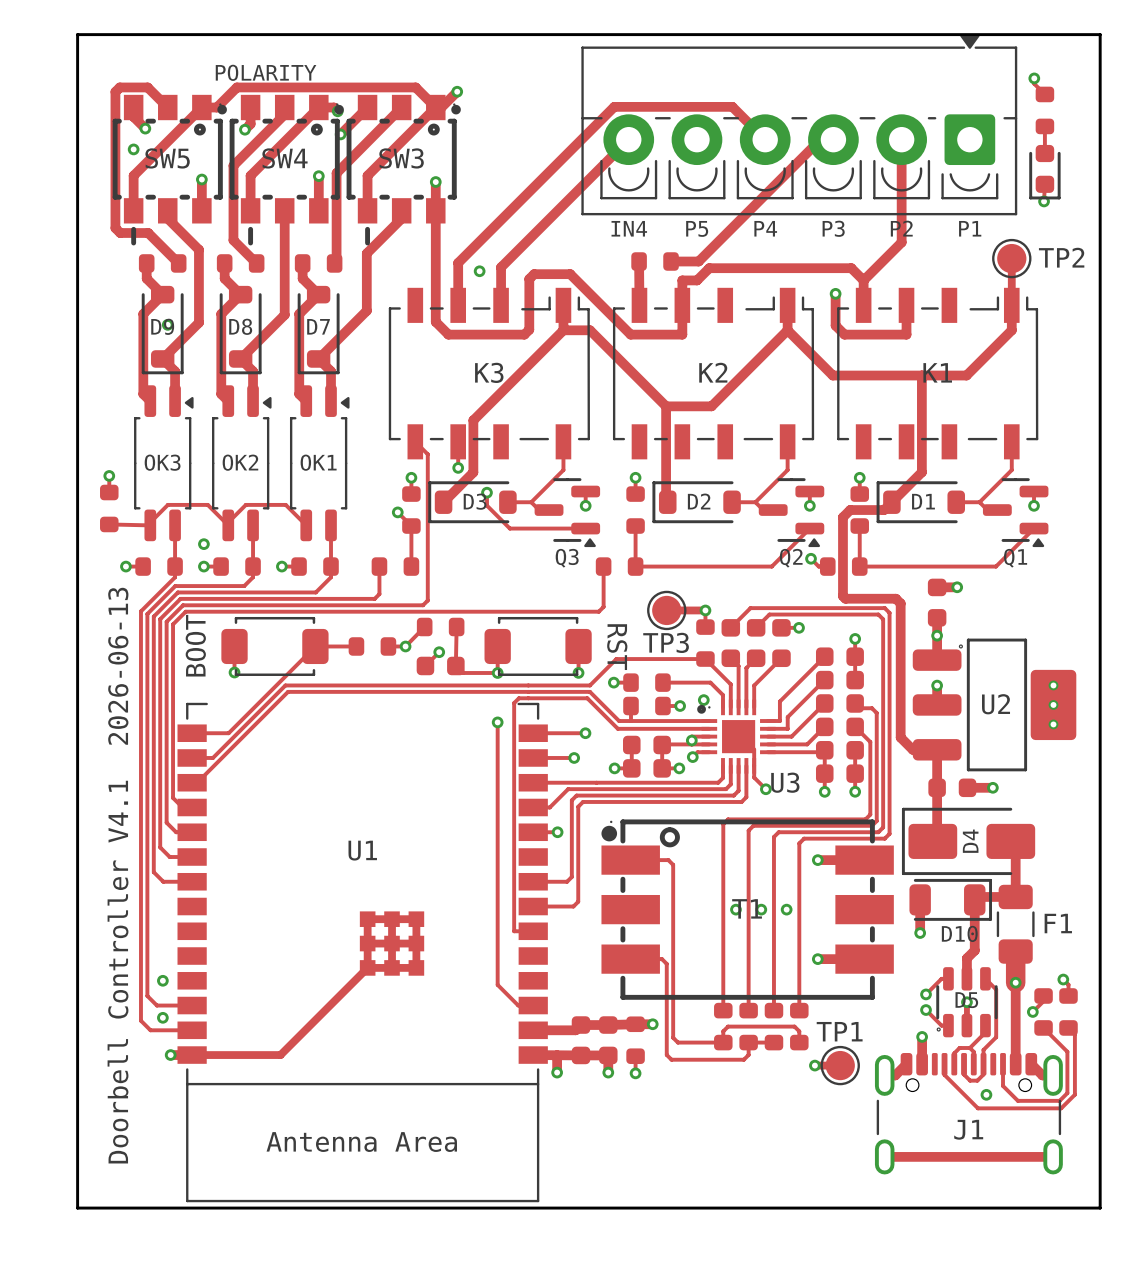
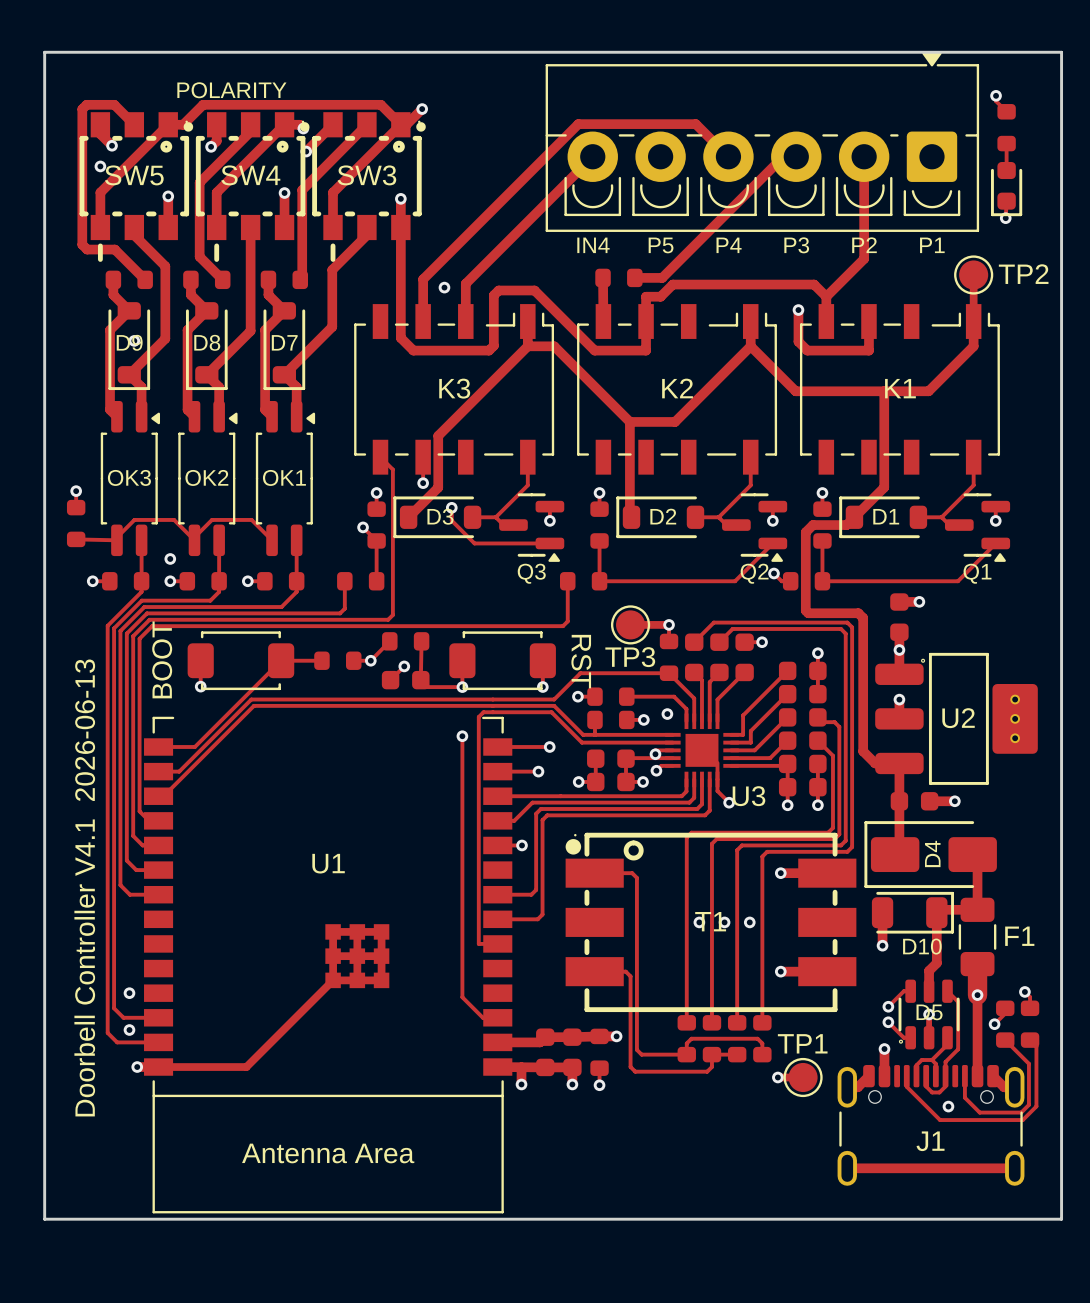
U3 footprint: [697, 699, 776, 774] -> [665, 713, 739, 788]

